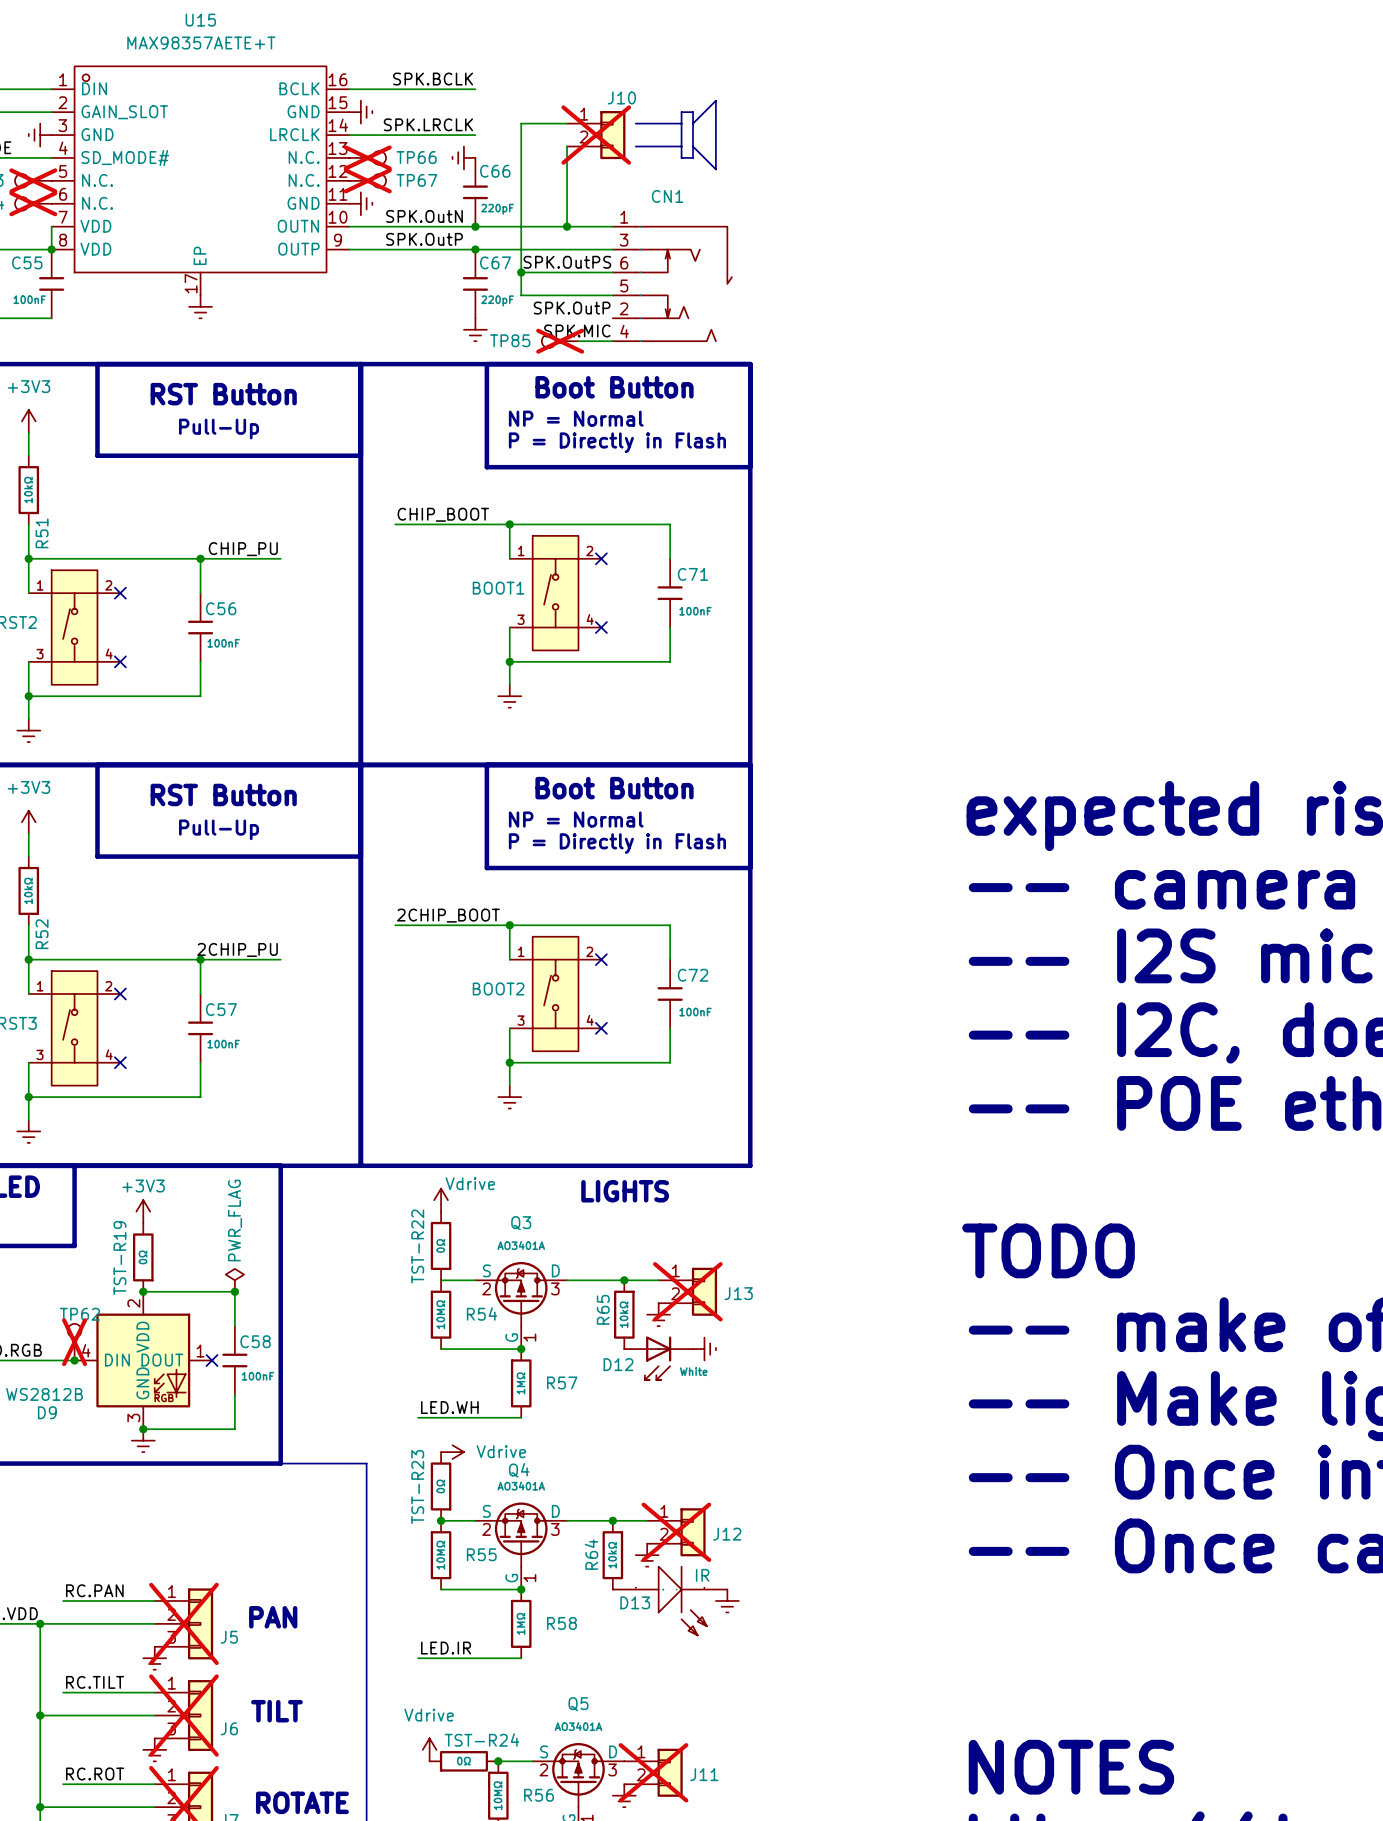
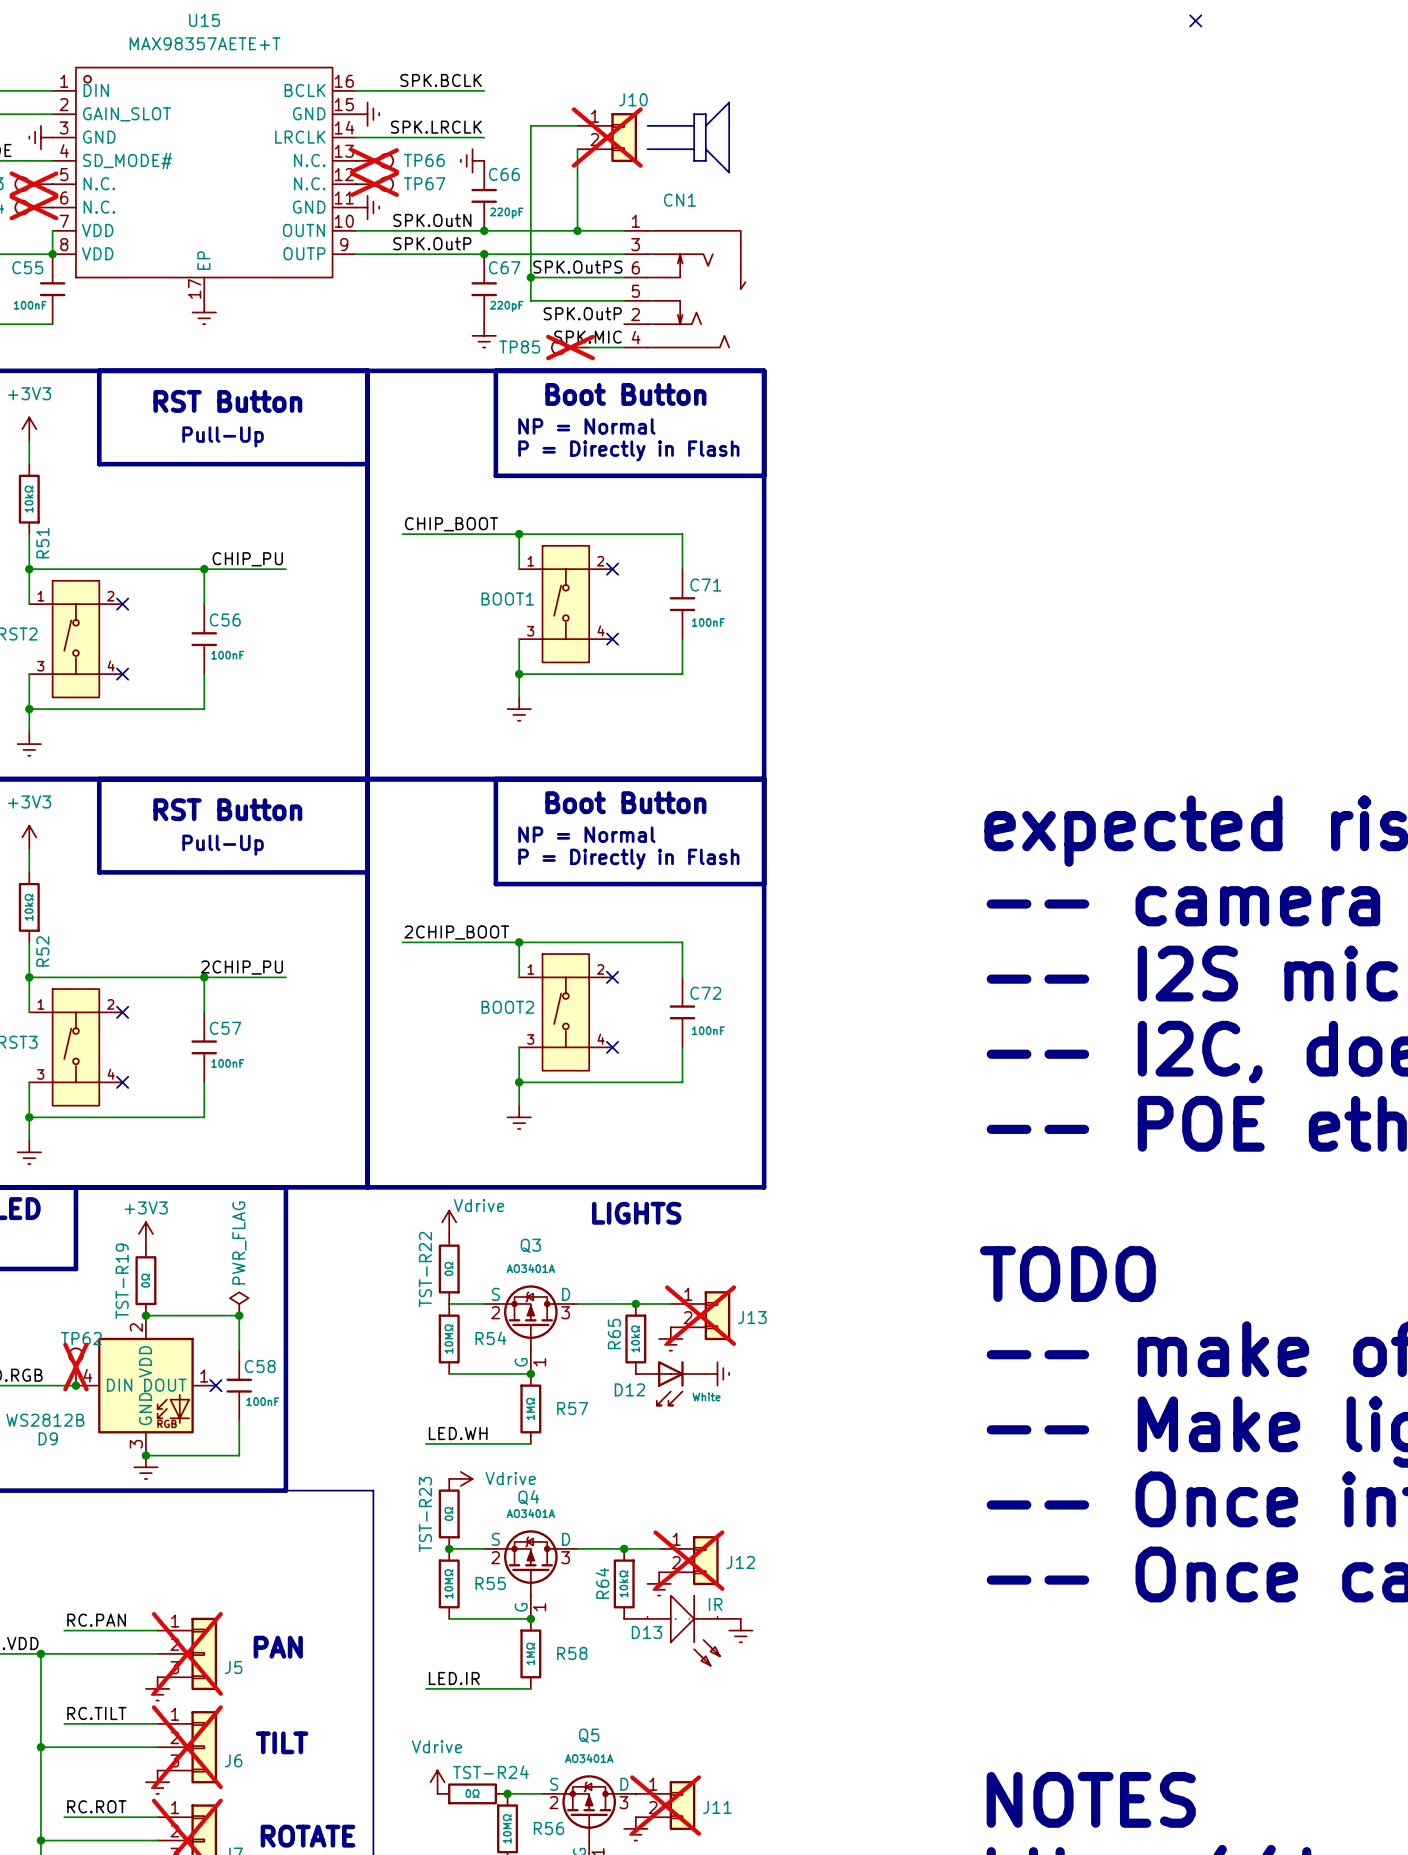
no-connect mark: none -> (1195, 20)

